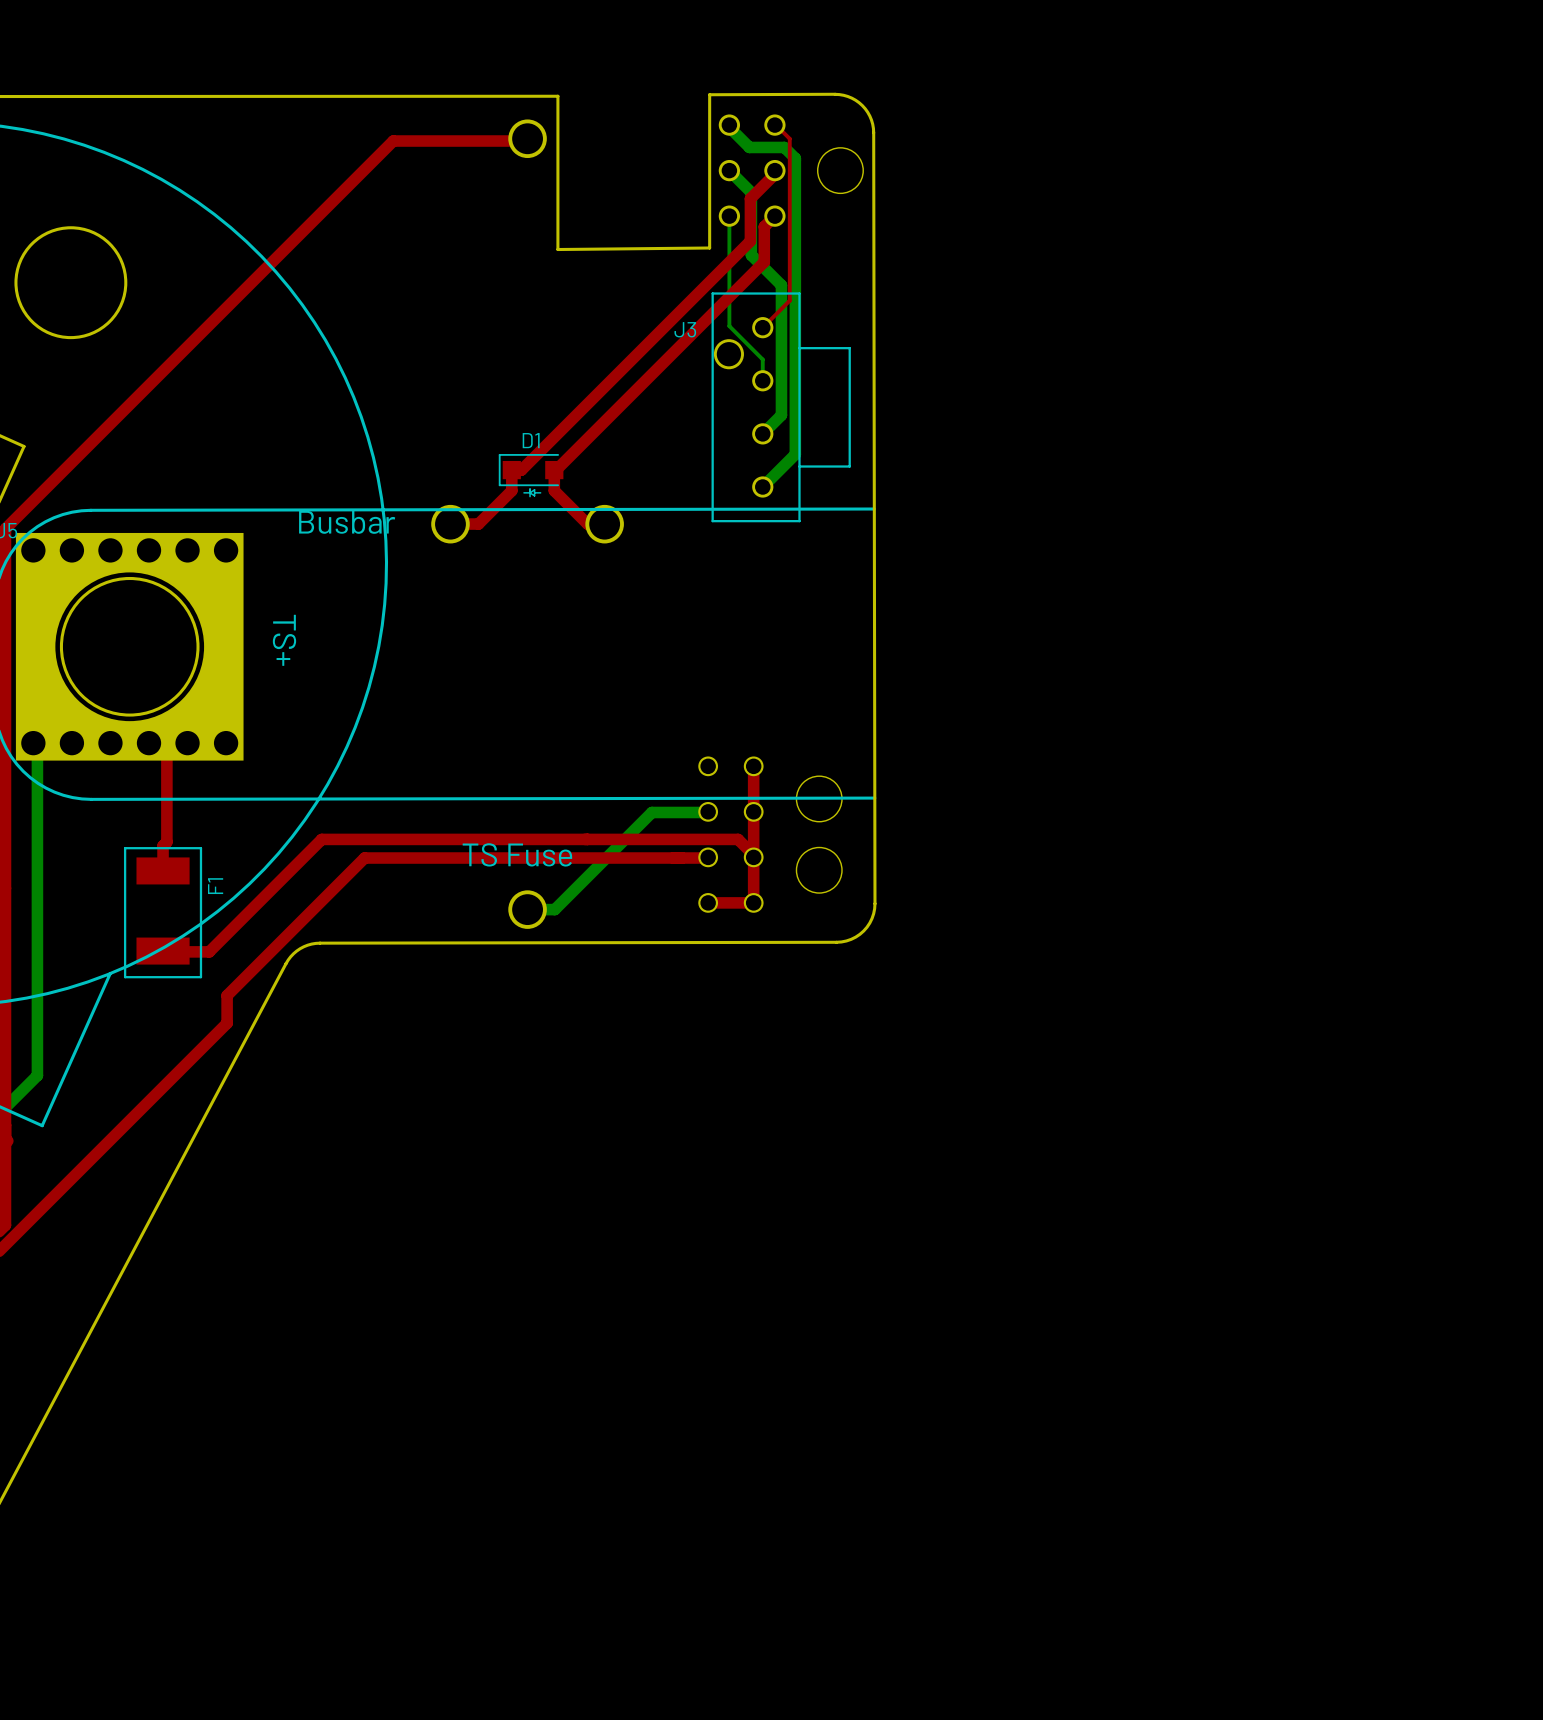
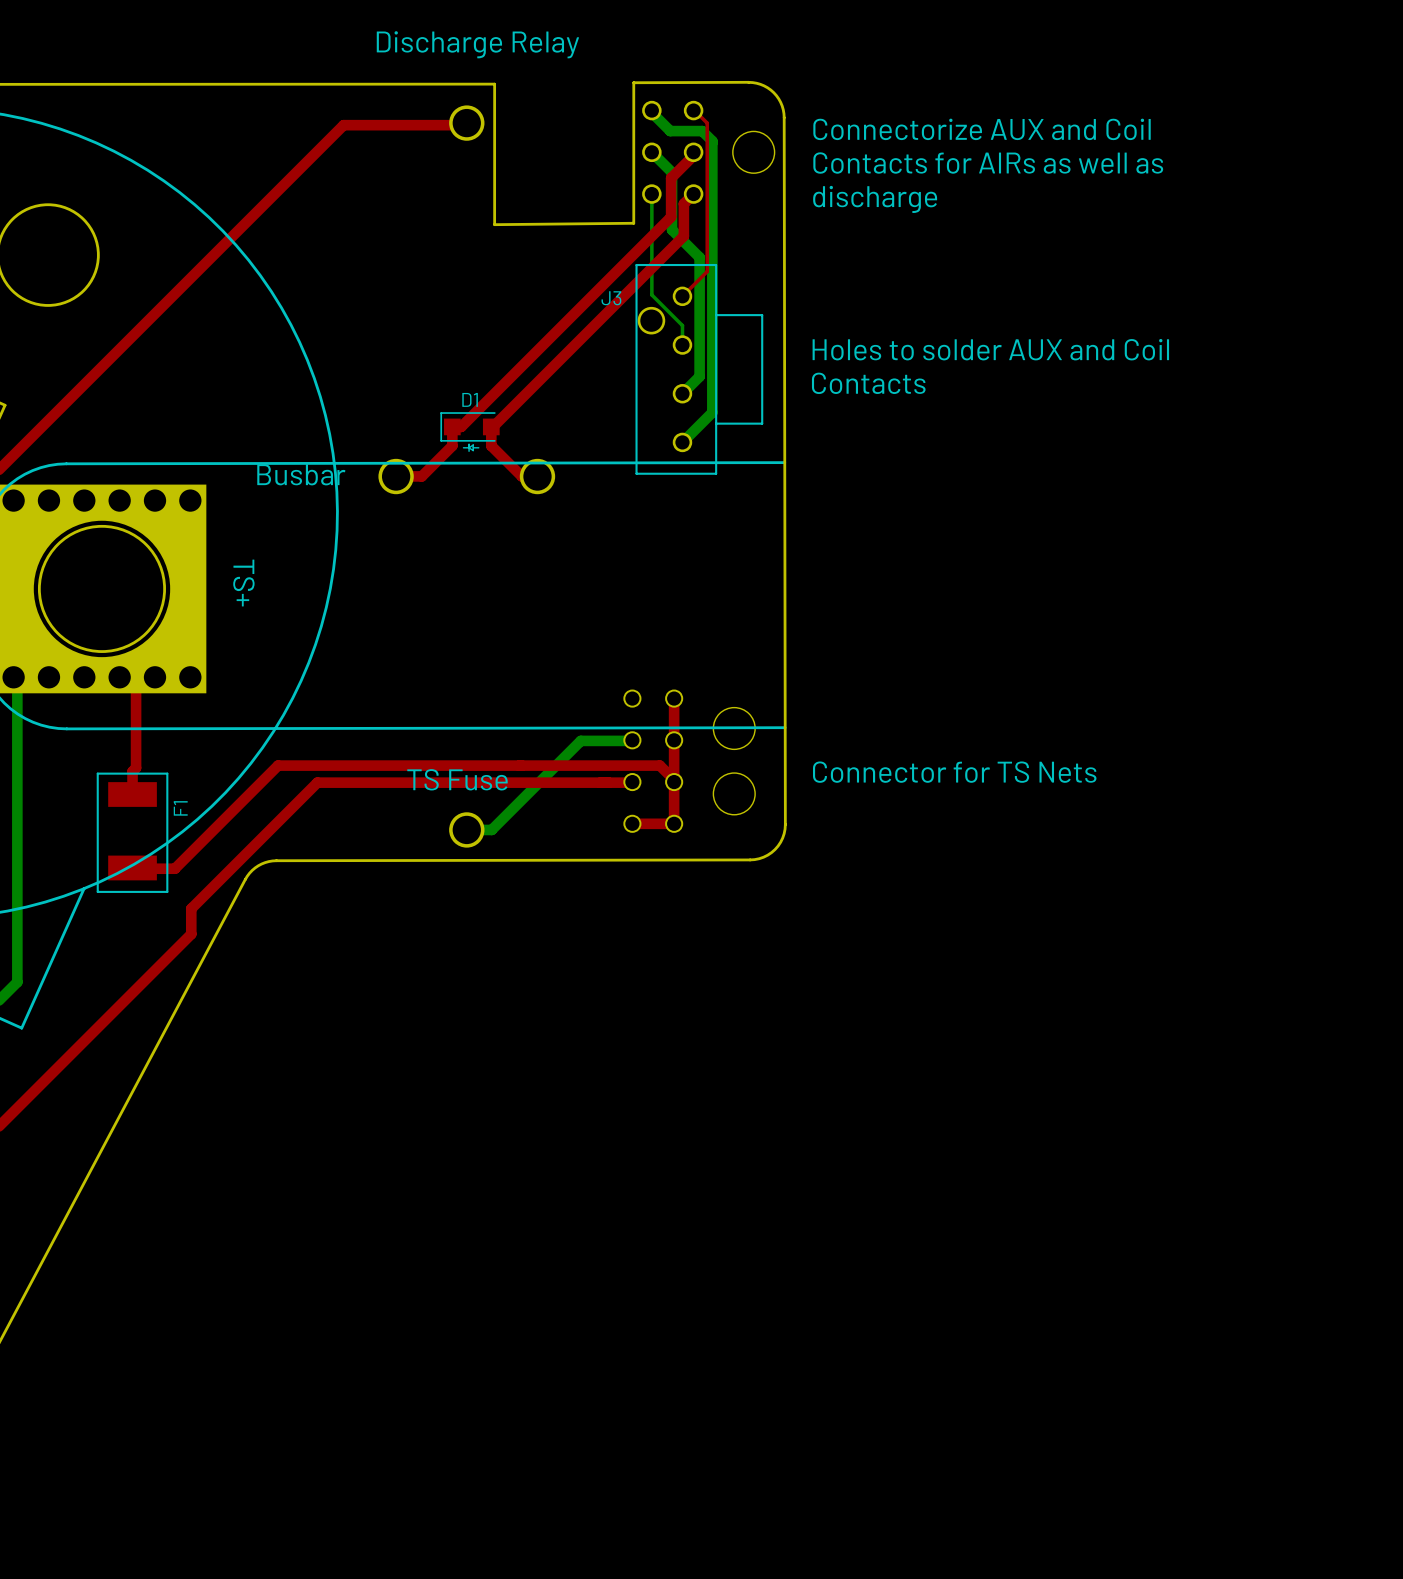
text: none -> Discharge Relay (477, 44)
text: none -> Connectorize AUX and Coil (982, 129)
text: none -> Contacts for AIRs as well as (988, 163)
text: none -> discharge (875, 199)
text: none -> Holes to solder AUX and Coil (990, 349)
text: none -> Contacts (868, 383)
text: none -> Connector for TS Nets (954, 772)

